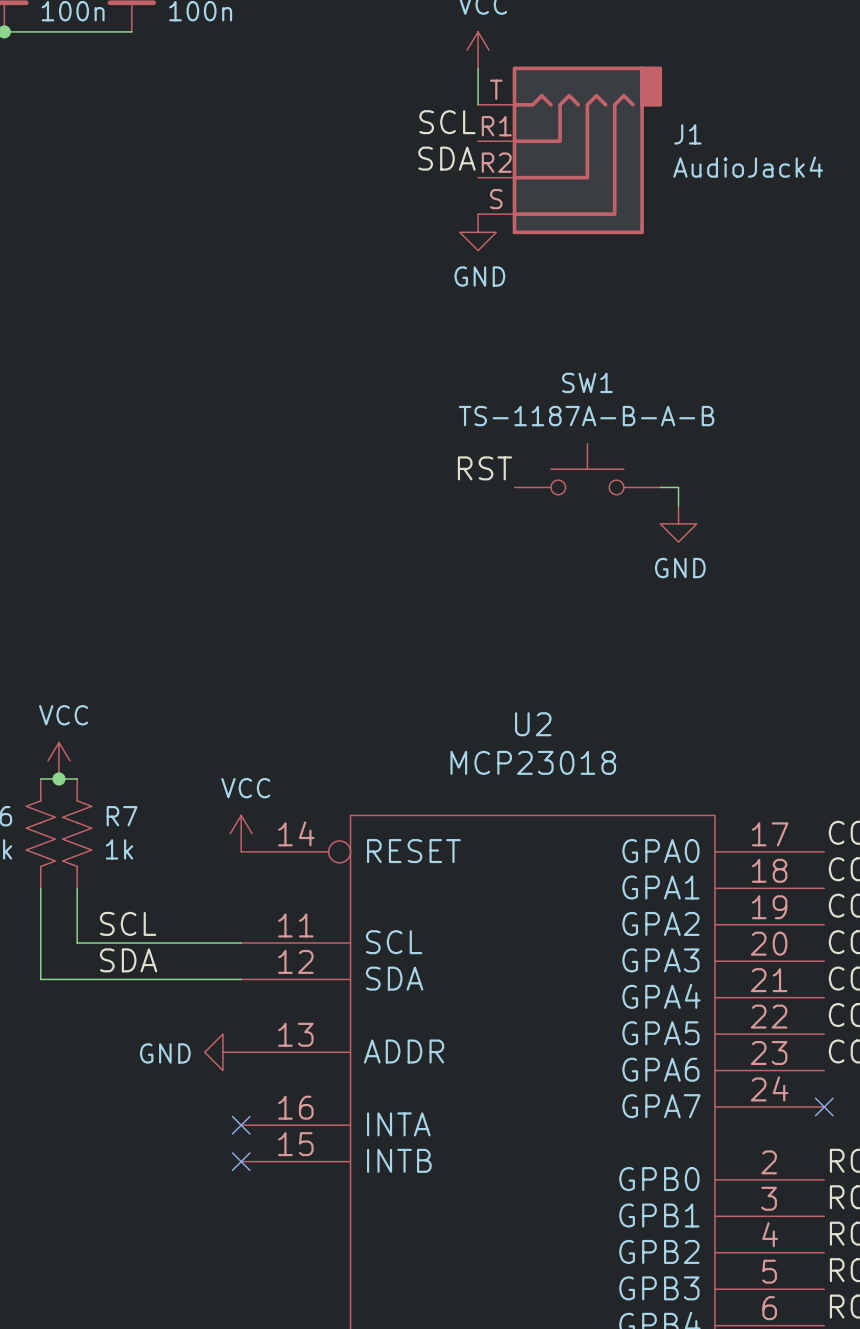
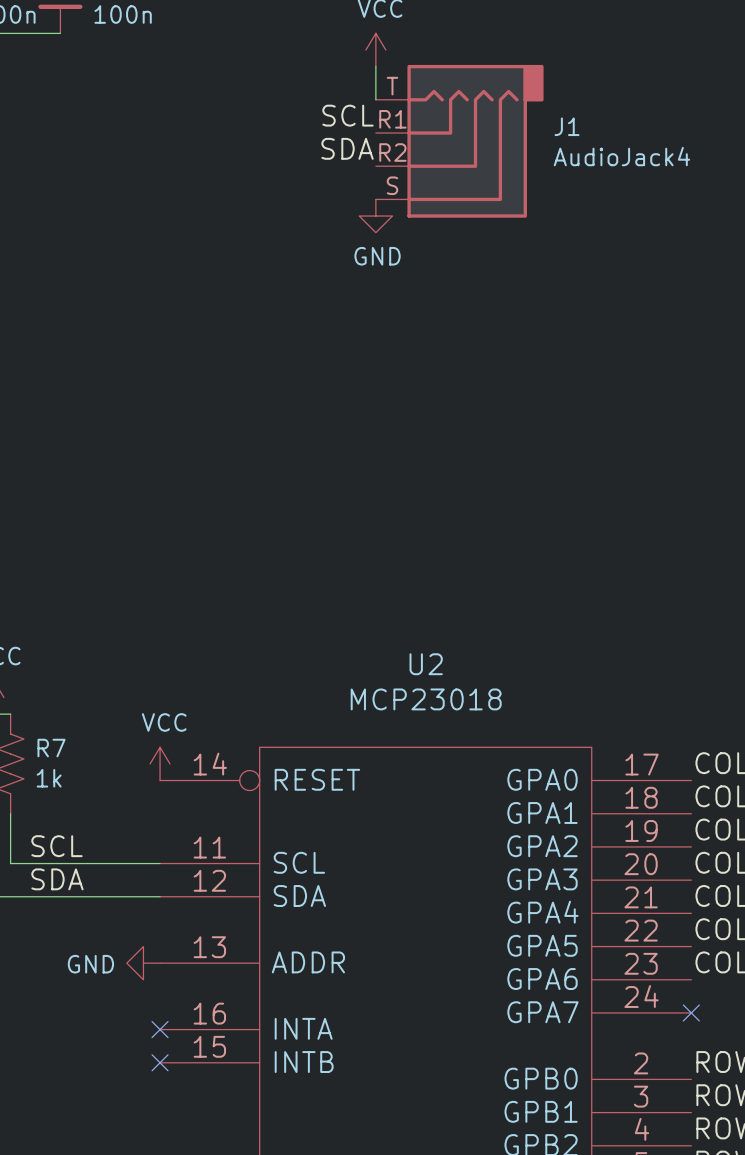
label: RST (484, 468) -> none
SW1: TS-1187A-B-A-B (587, 469) -> none
wire: (660, 487) (678, 487) (678, 505) -> none
power symbol: GND (678, 523) -> none

